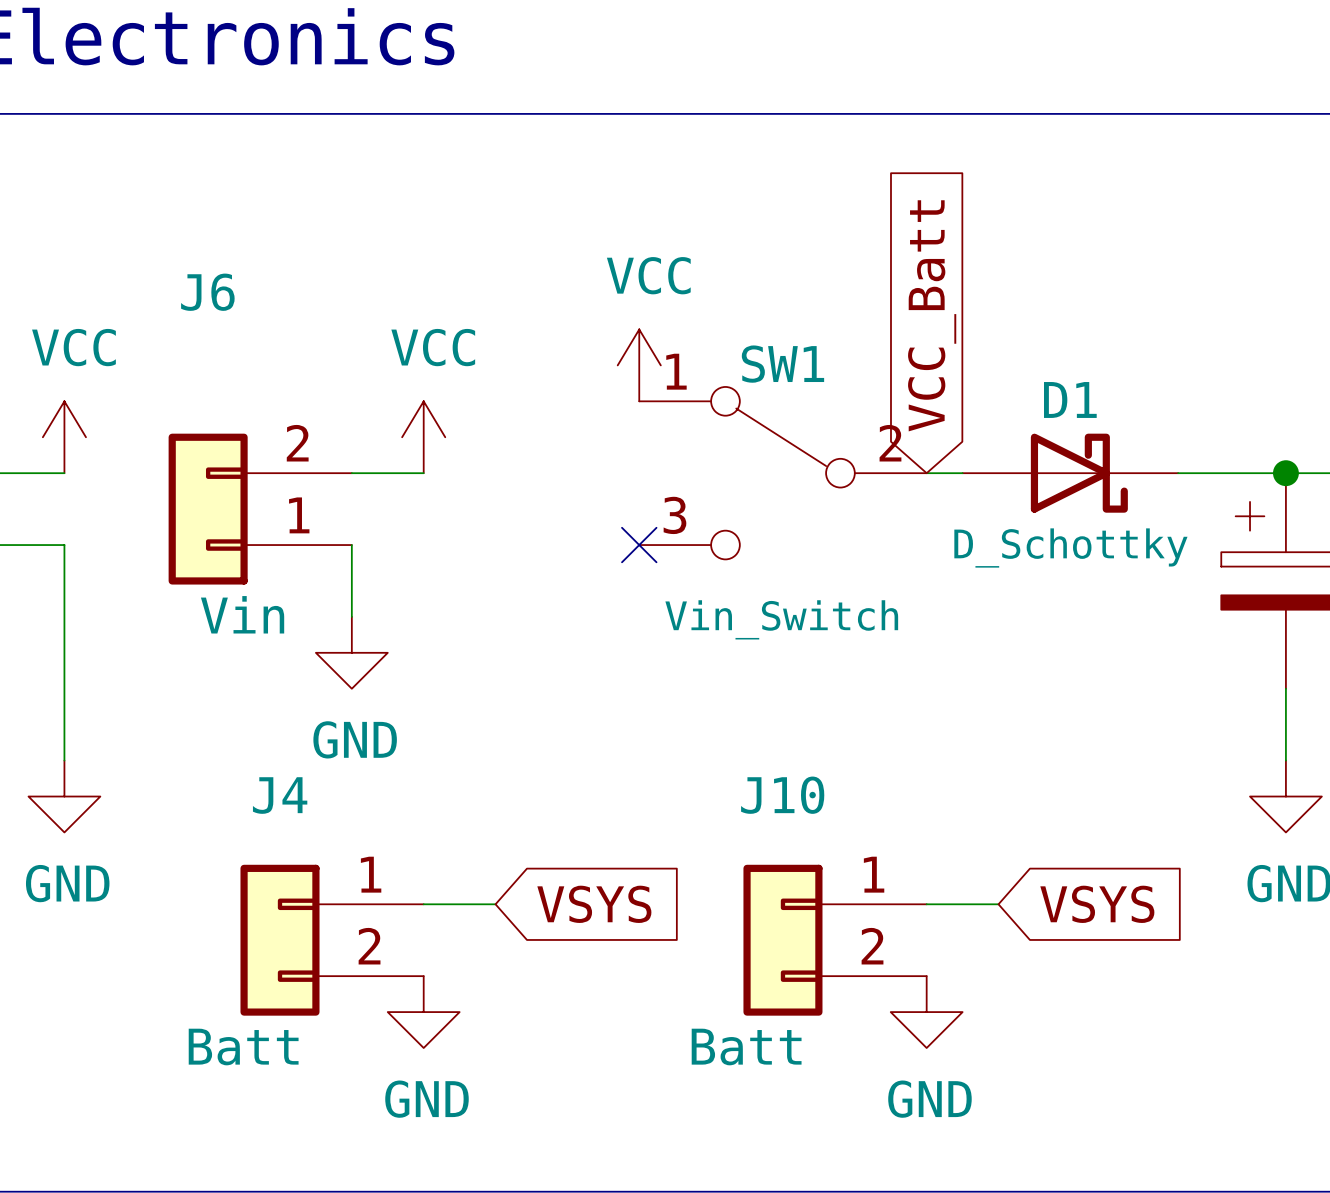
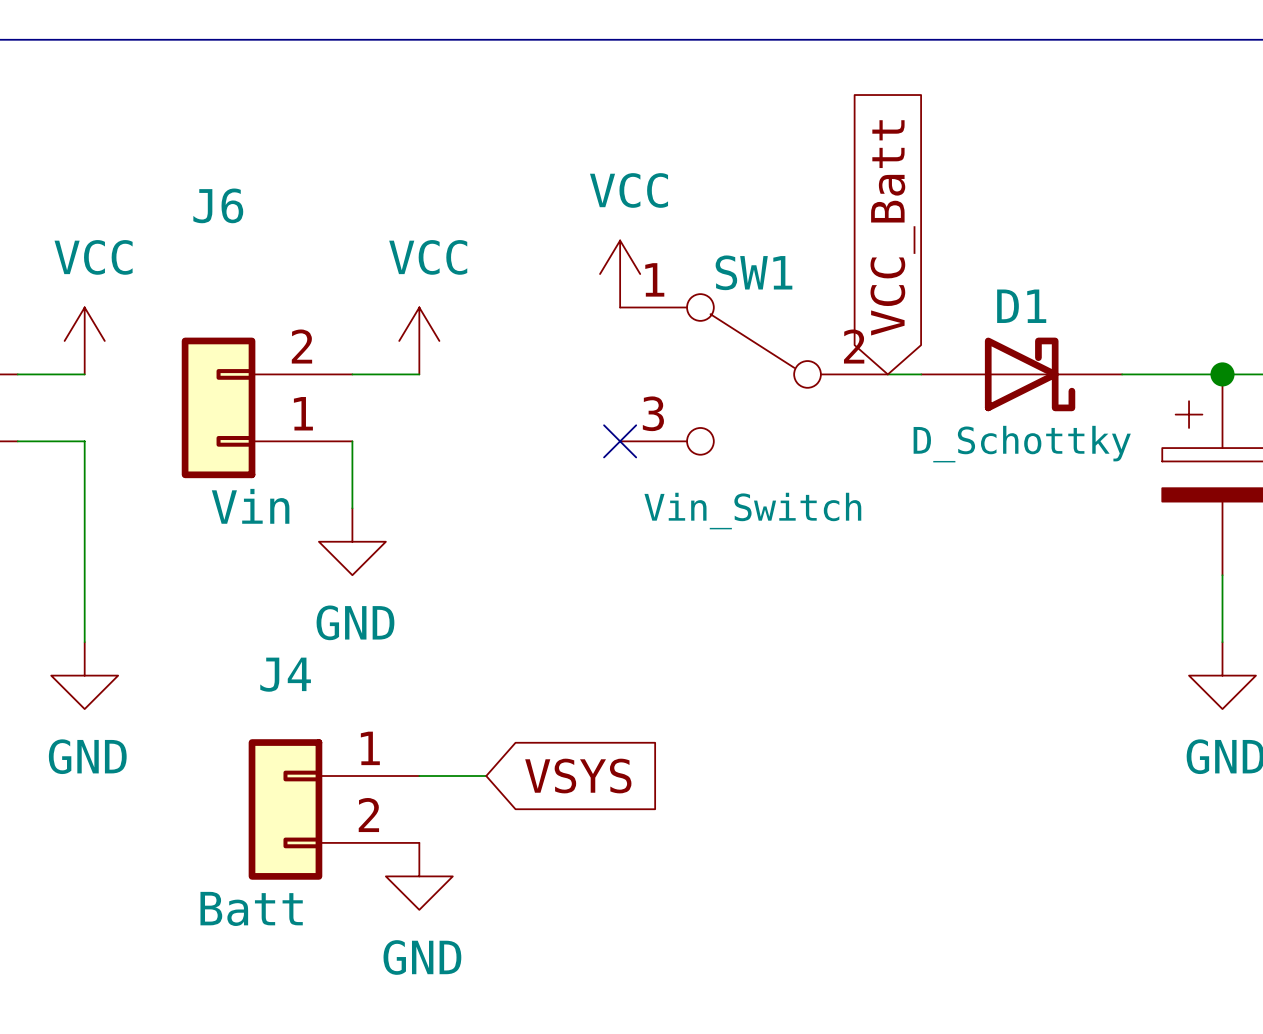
wire: (926, 904) (998, 904) -> none
global label: VSYS (1097, 904) -> none
J10: Batt (835, 940) -> none
power symbol: GND (926, 1012) -> none

